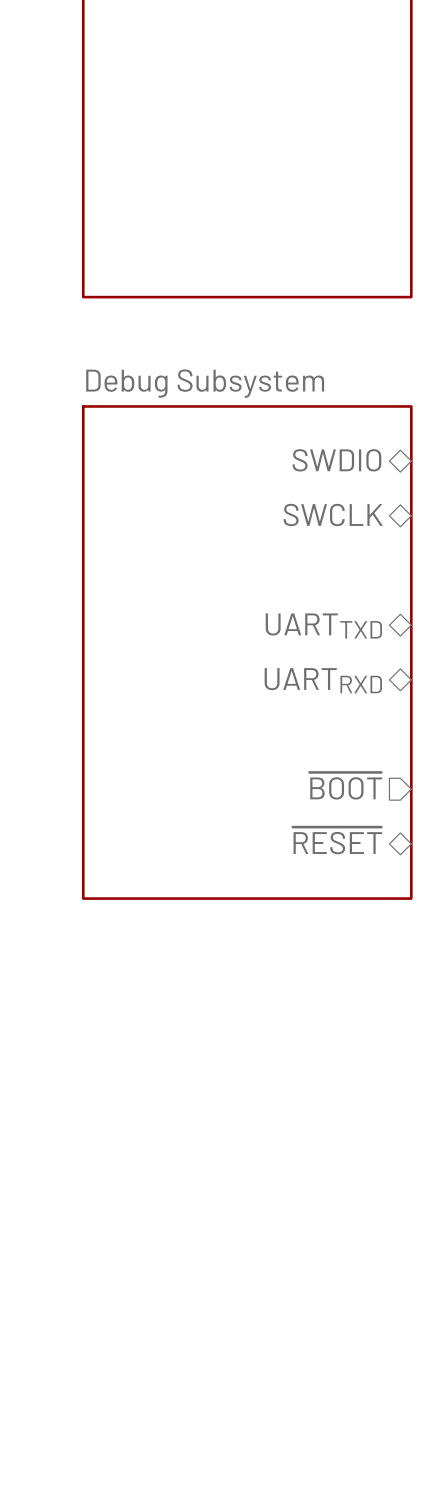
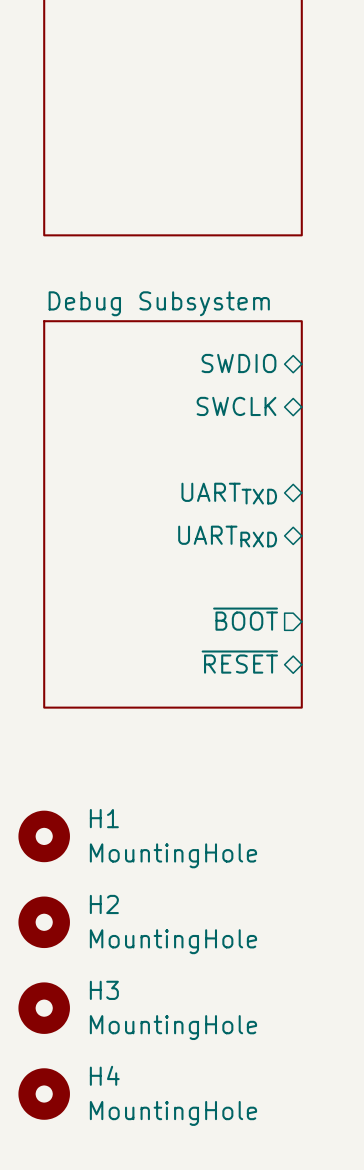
H1: none -> MountingHole (44, 836)
H2: none -> MountingHole (44, 922)
H3: none -> MountingHole (44, 1008)
H4: none -> MountingHole (44, 1094)

